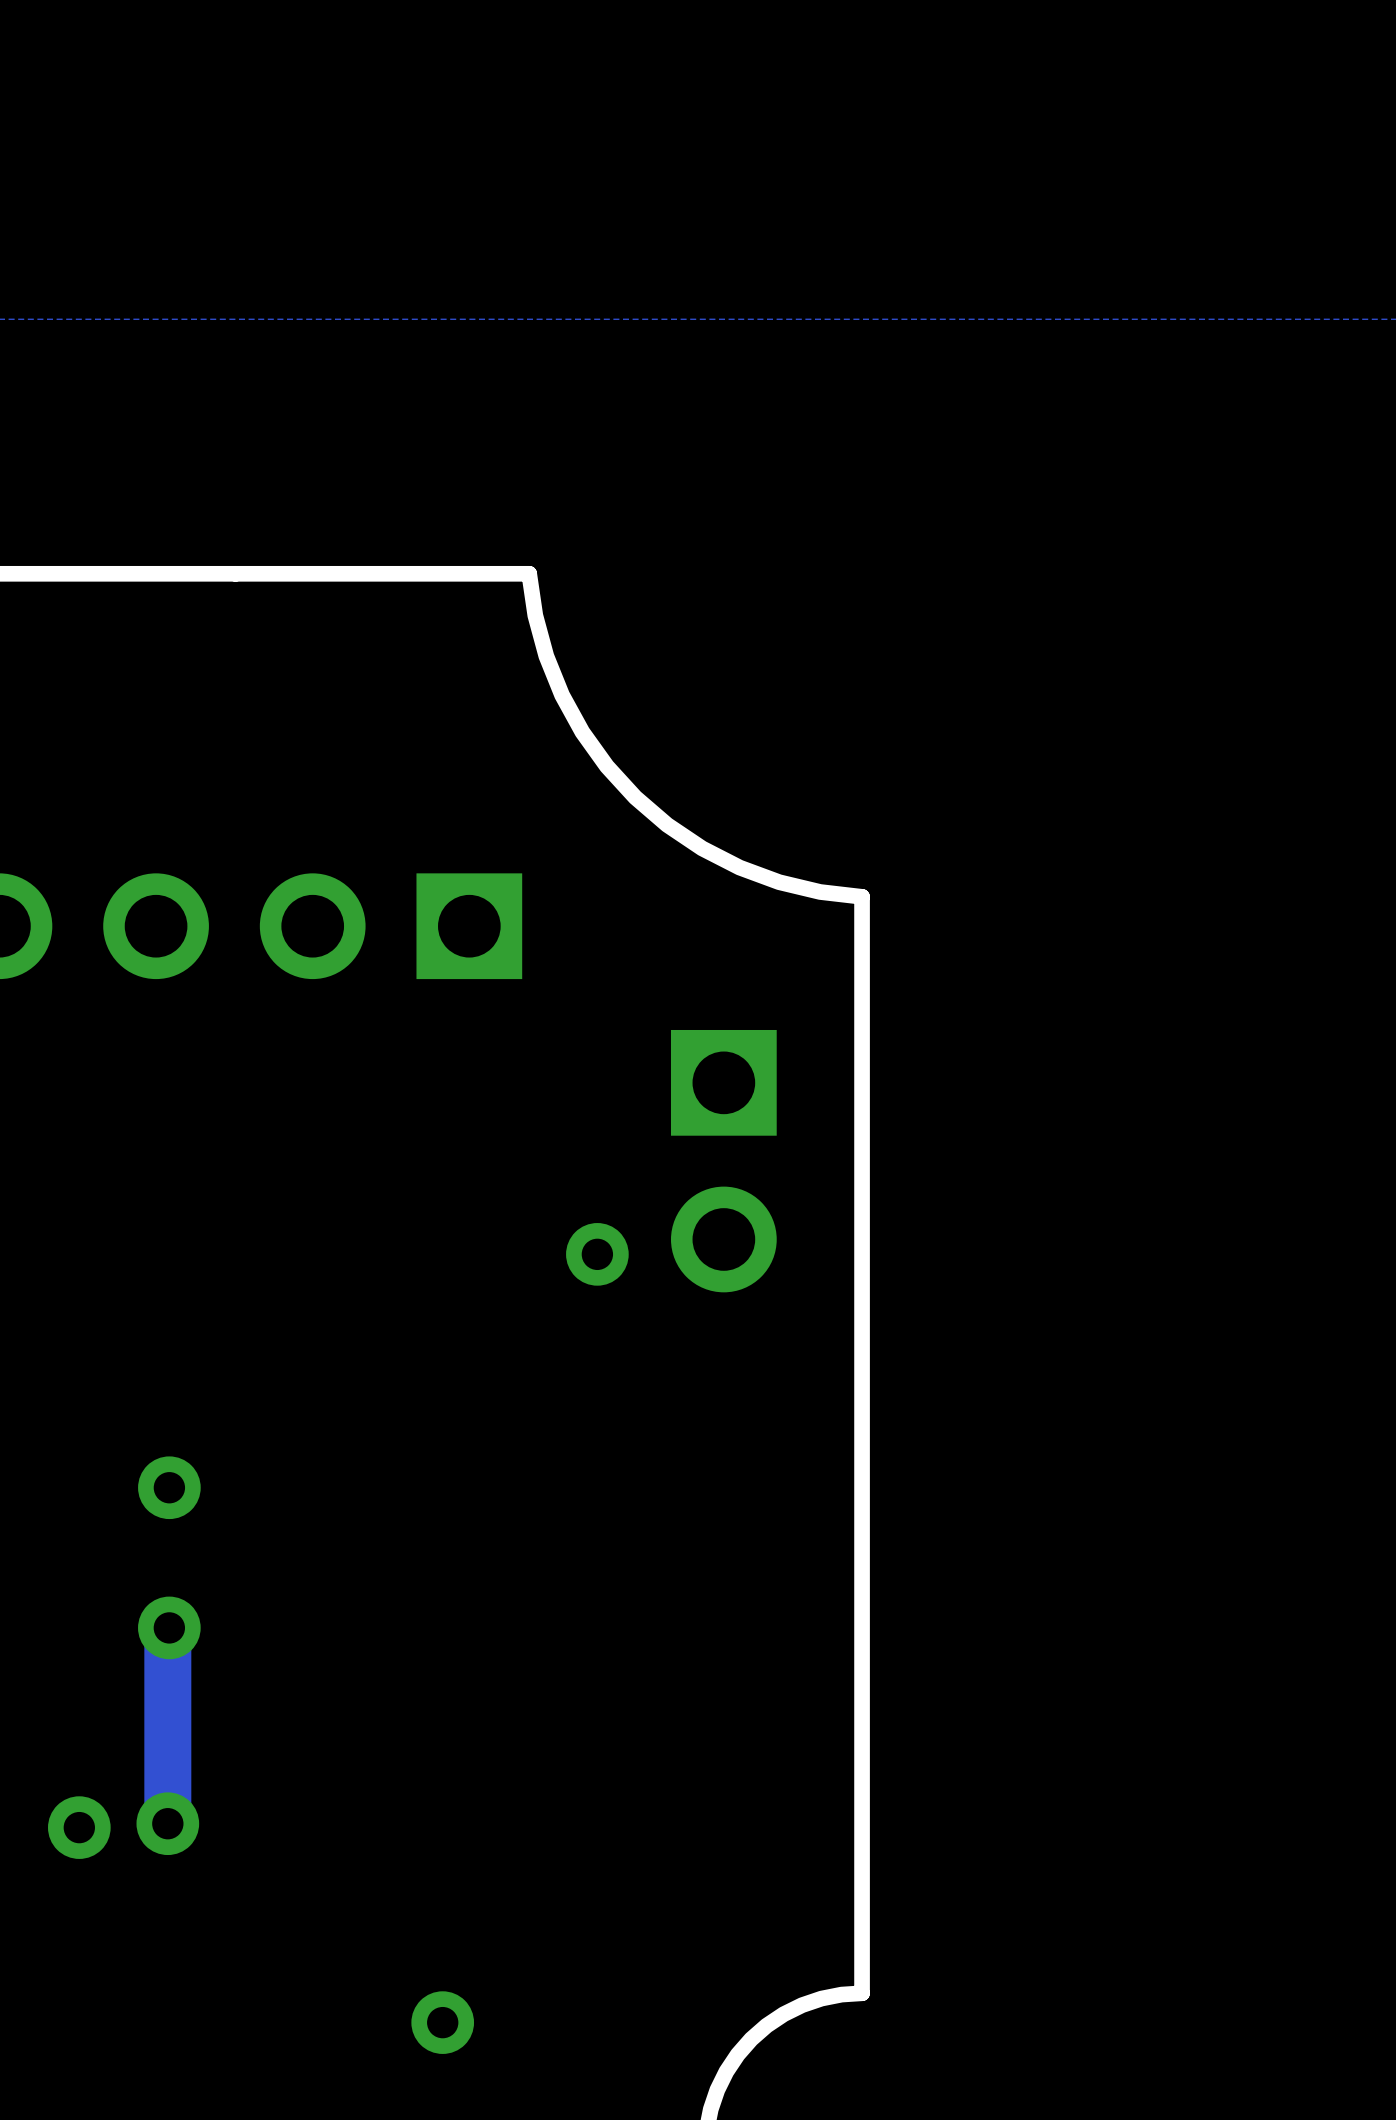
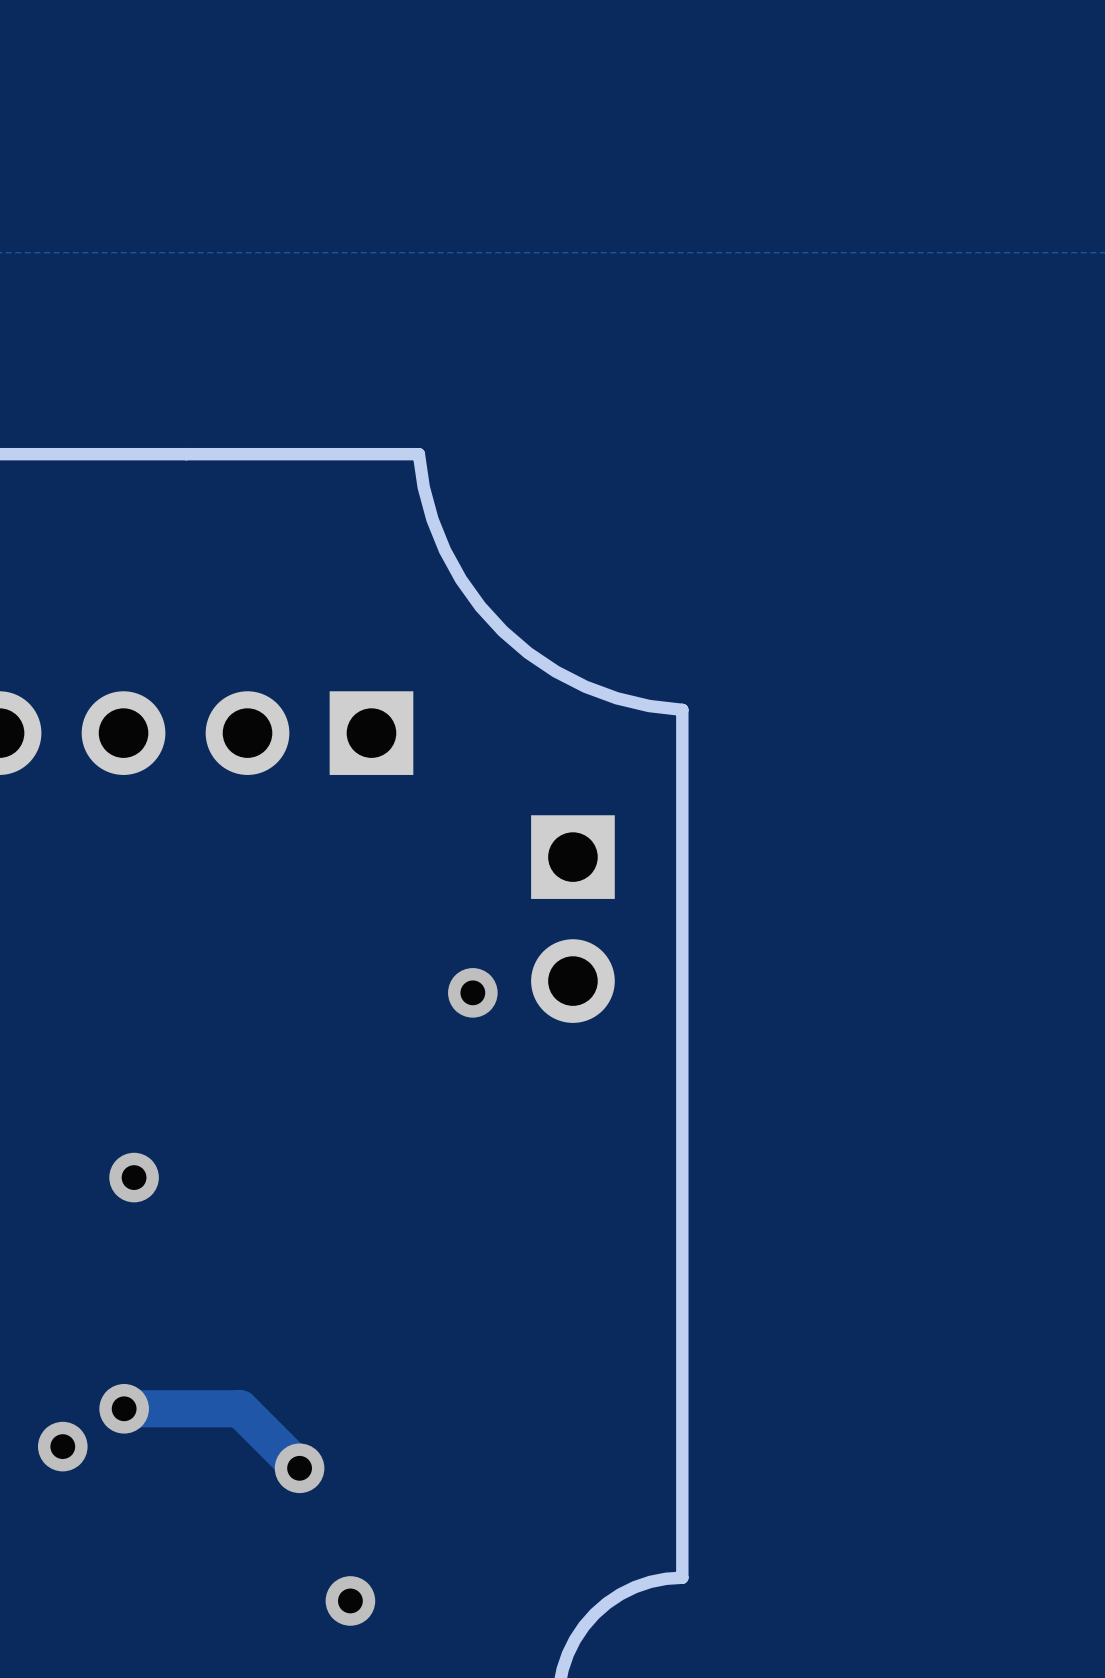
track: (169, 1627) (167, 1629) (167, 1823) -> none
via: (169, 1627) -> none
track: none -> (124, 1408) (240, 1408) (299, 1468)
via position: (167, 1823) -> (124, 1408)
via: none -> (299, 1468)

